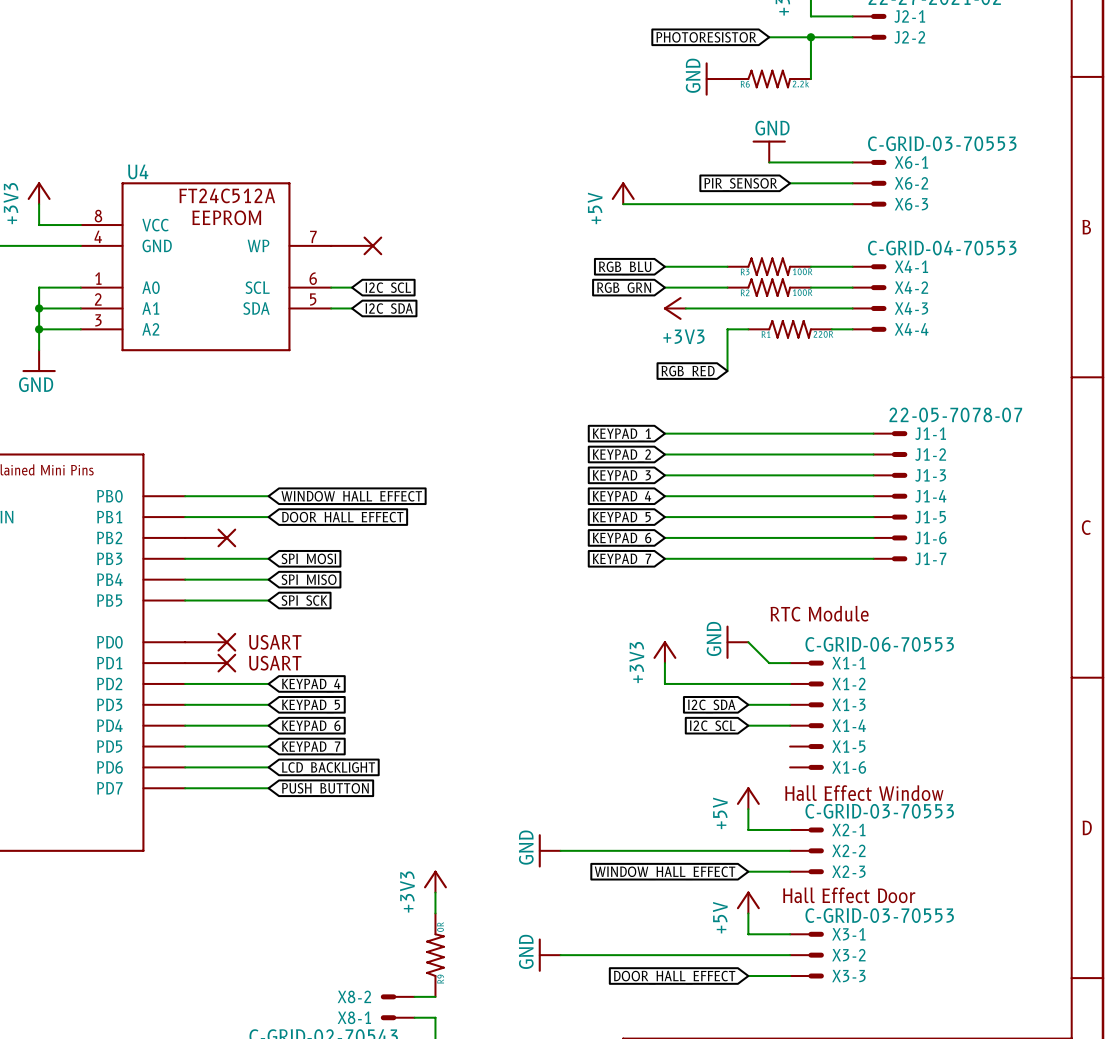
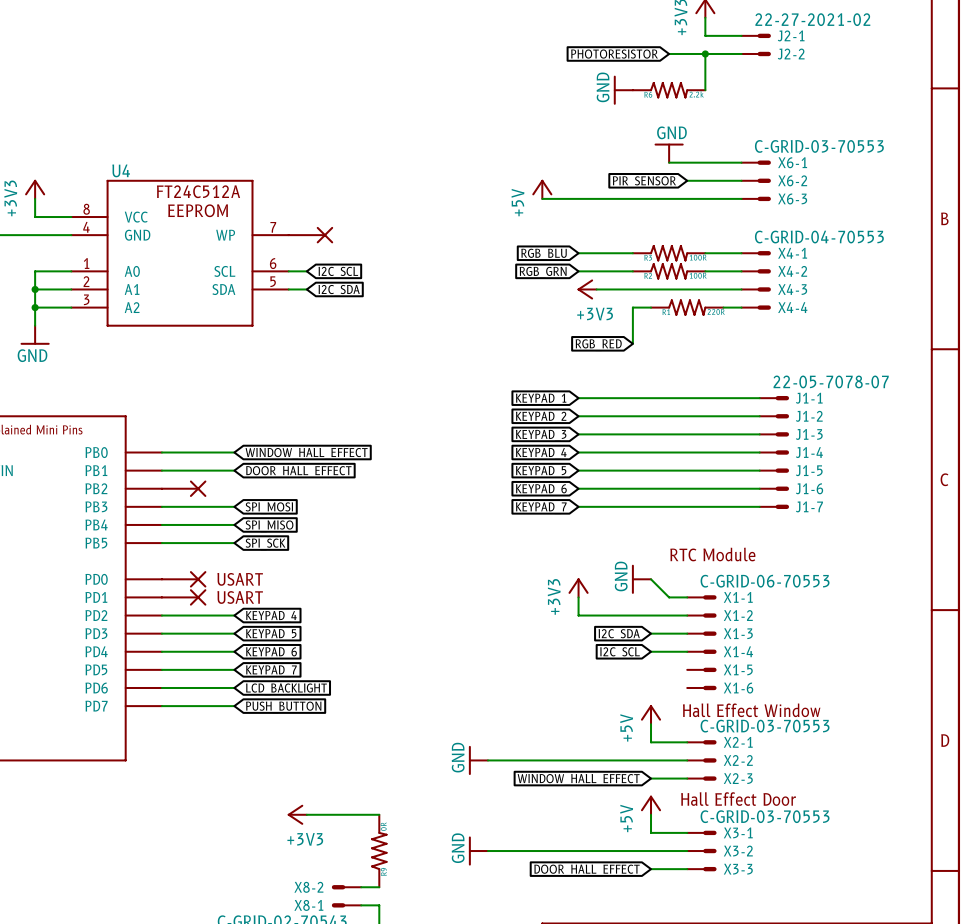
power symbol rotation: 0° (435, 879) -> 90° counterclockwise (295, 814)
power symbol position: +3V3 (435, 881) -> +3V3 (297, 814)
wire: (435, 892) (435, 913) -> (306, 814) (379, 814)

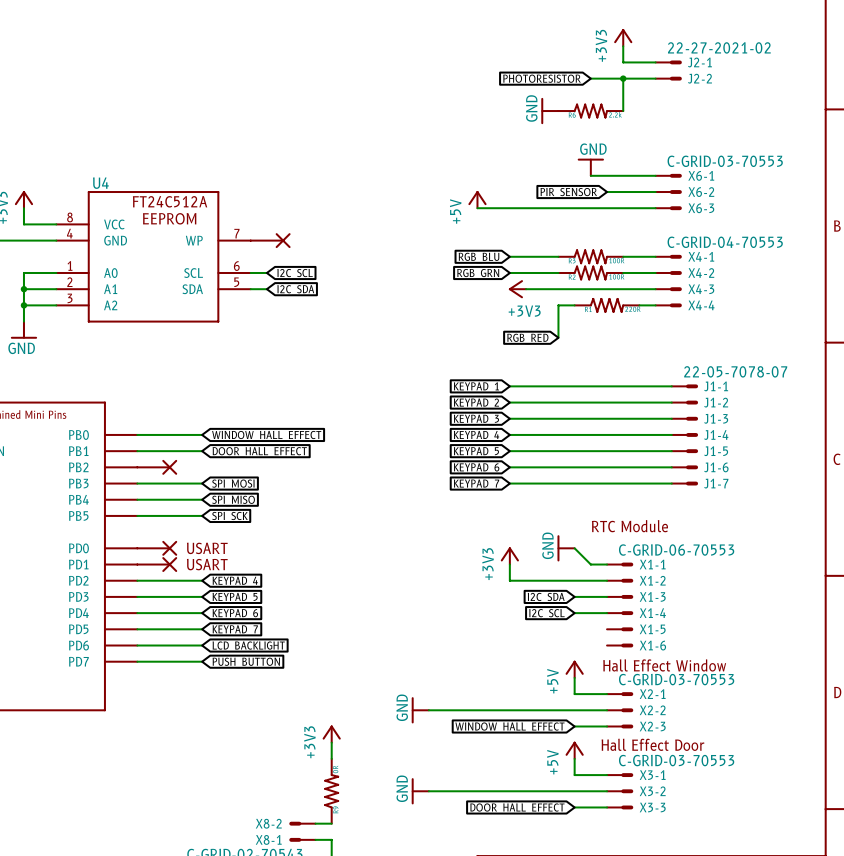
power symbol rotation: 0° (295, 814) -> 90° clockwise (331, 732)
power symbol position: +3V3 (297, 814) -> +3V3 (331, 734)
wire: (306, 814) (379, 814) -> (331, 742) (331, 758)

